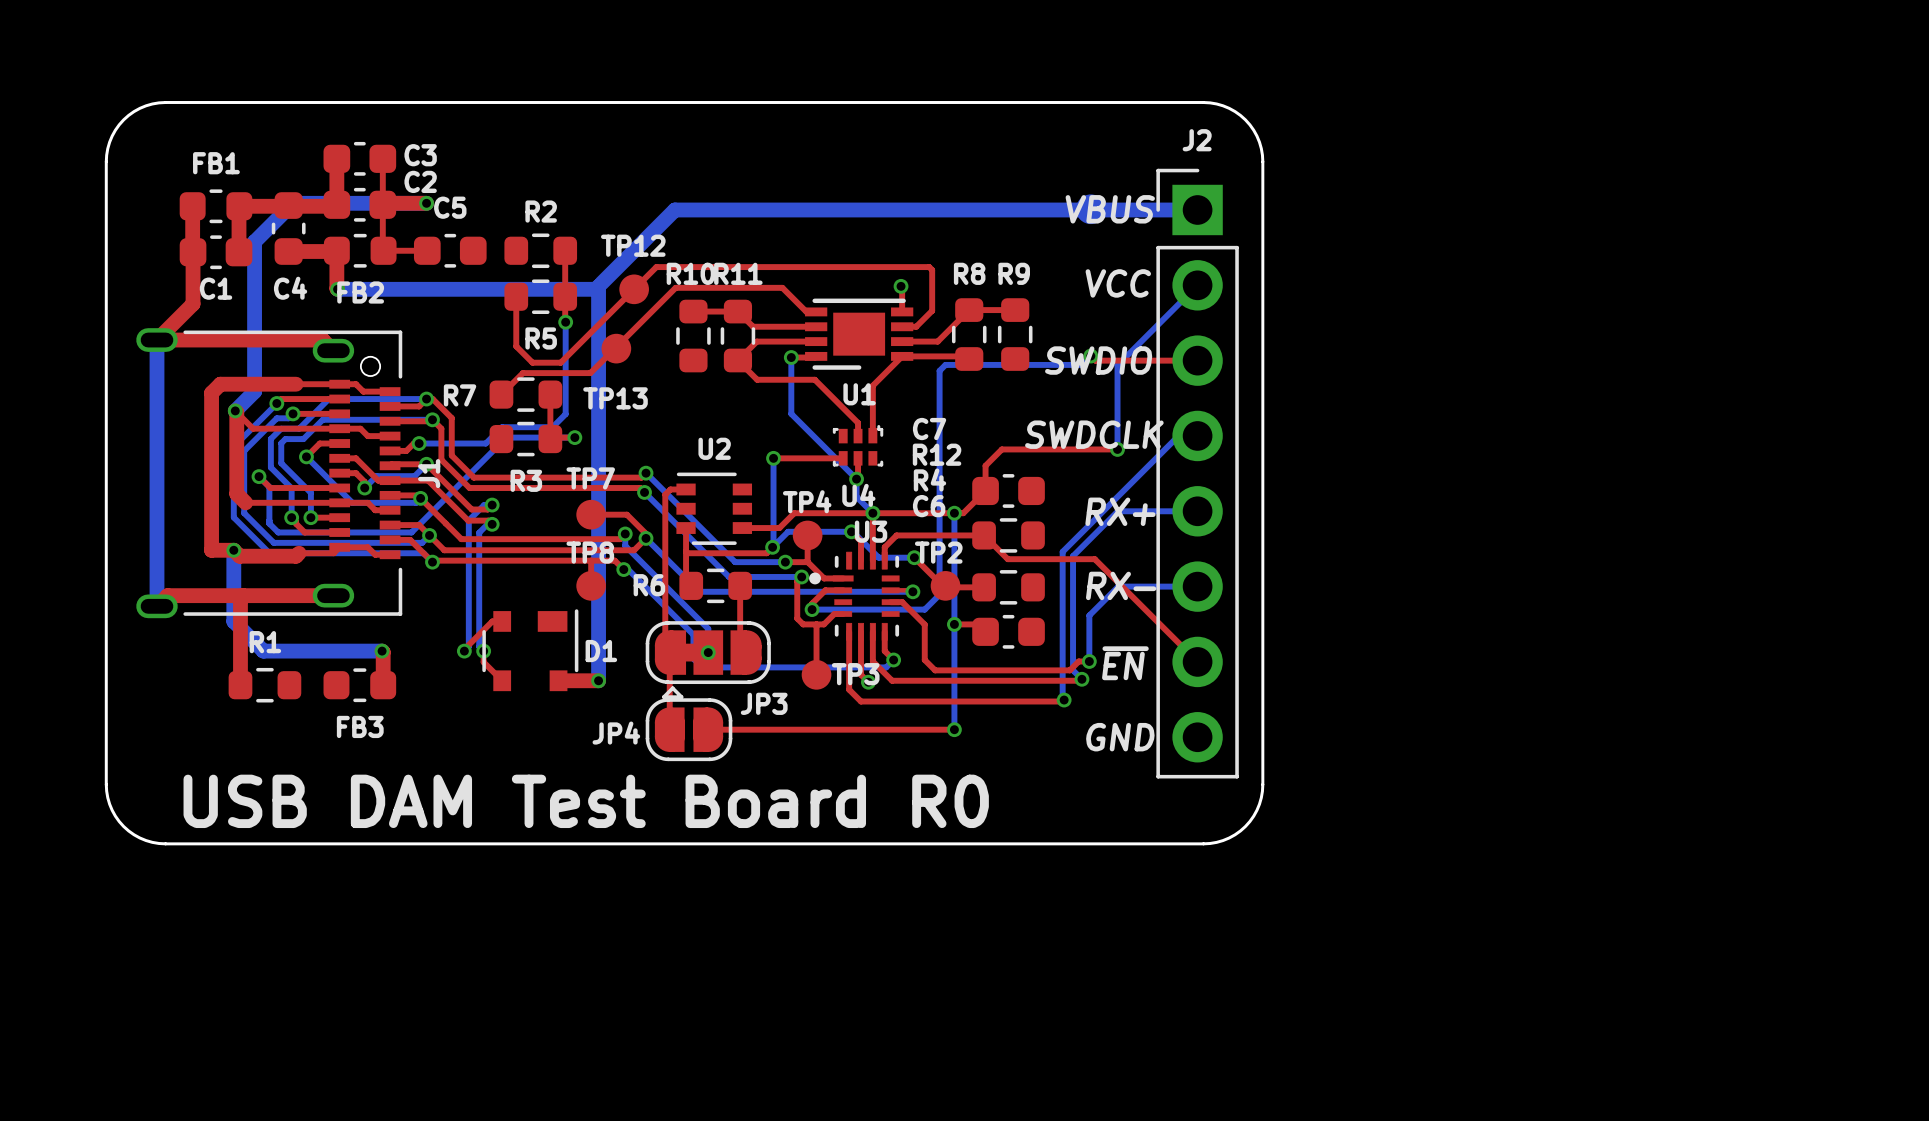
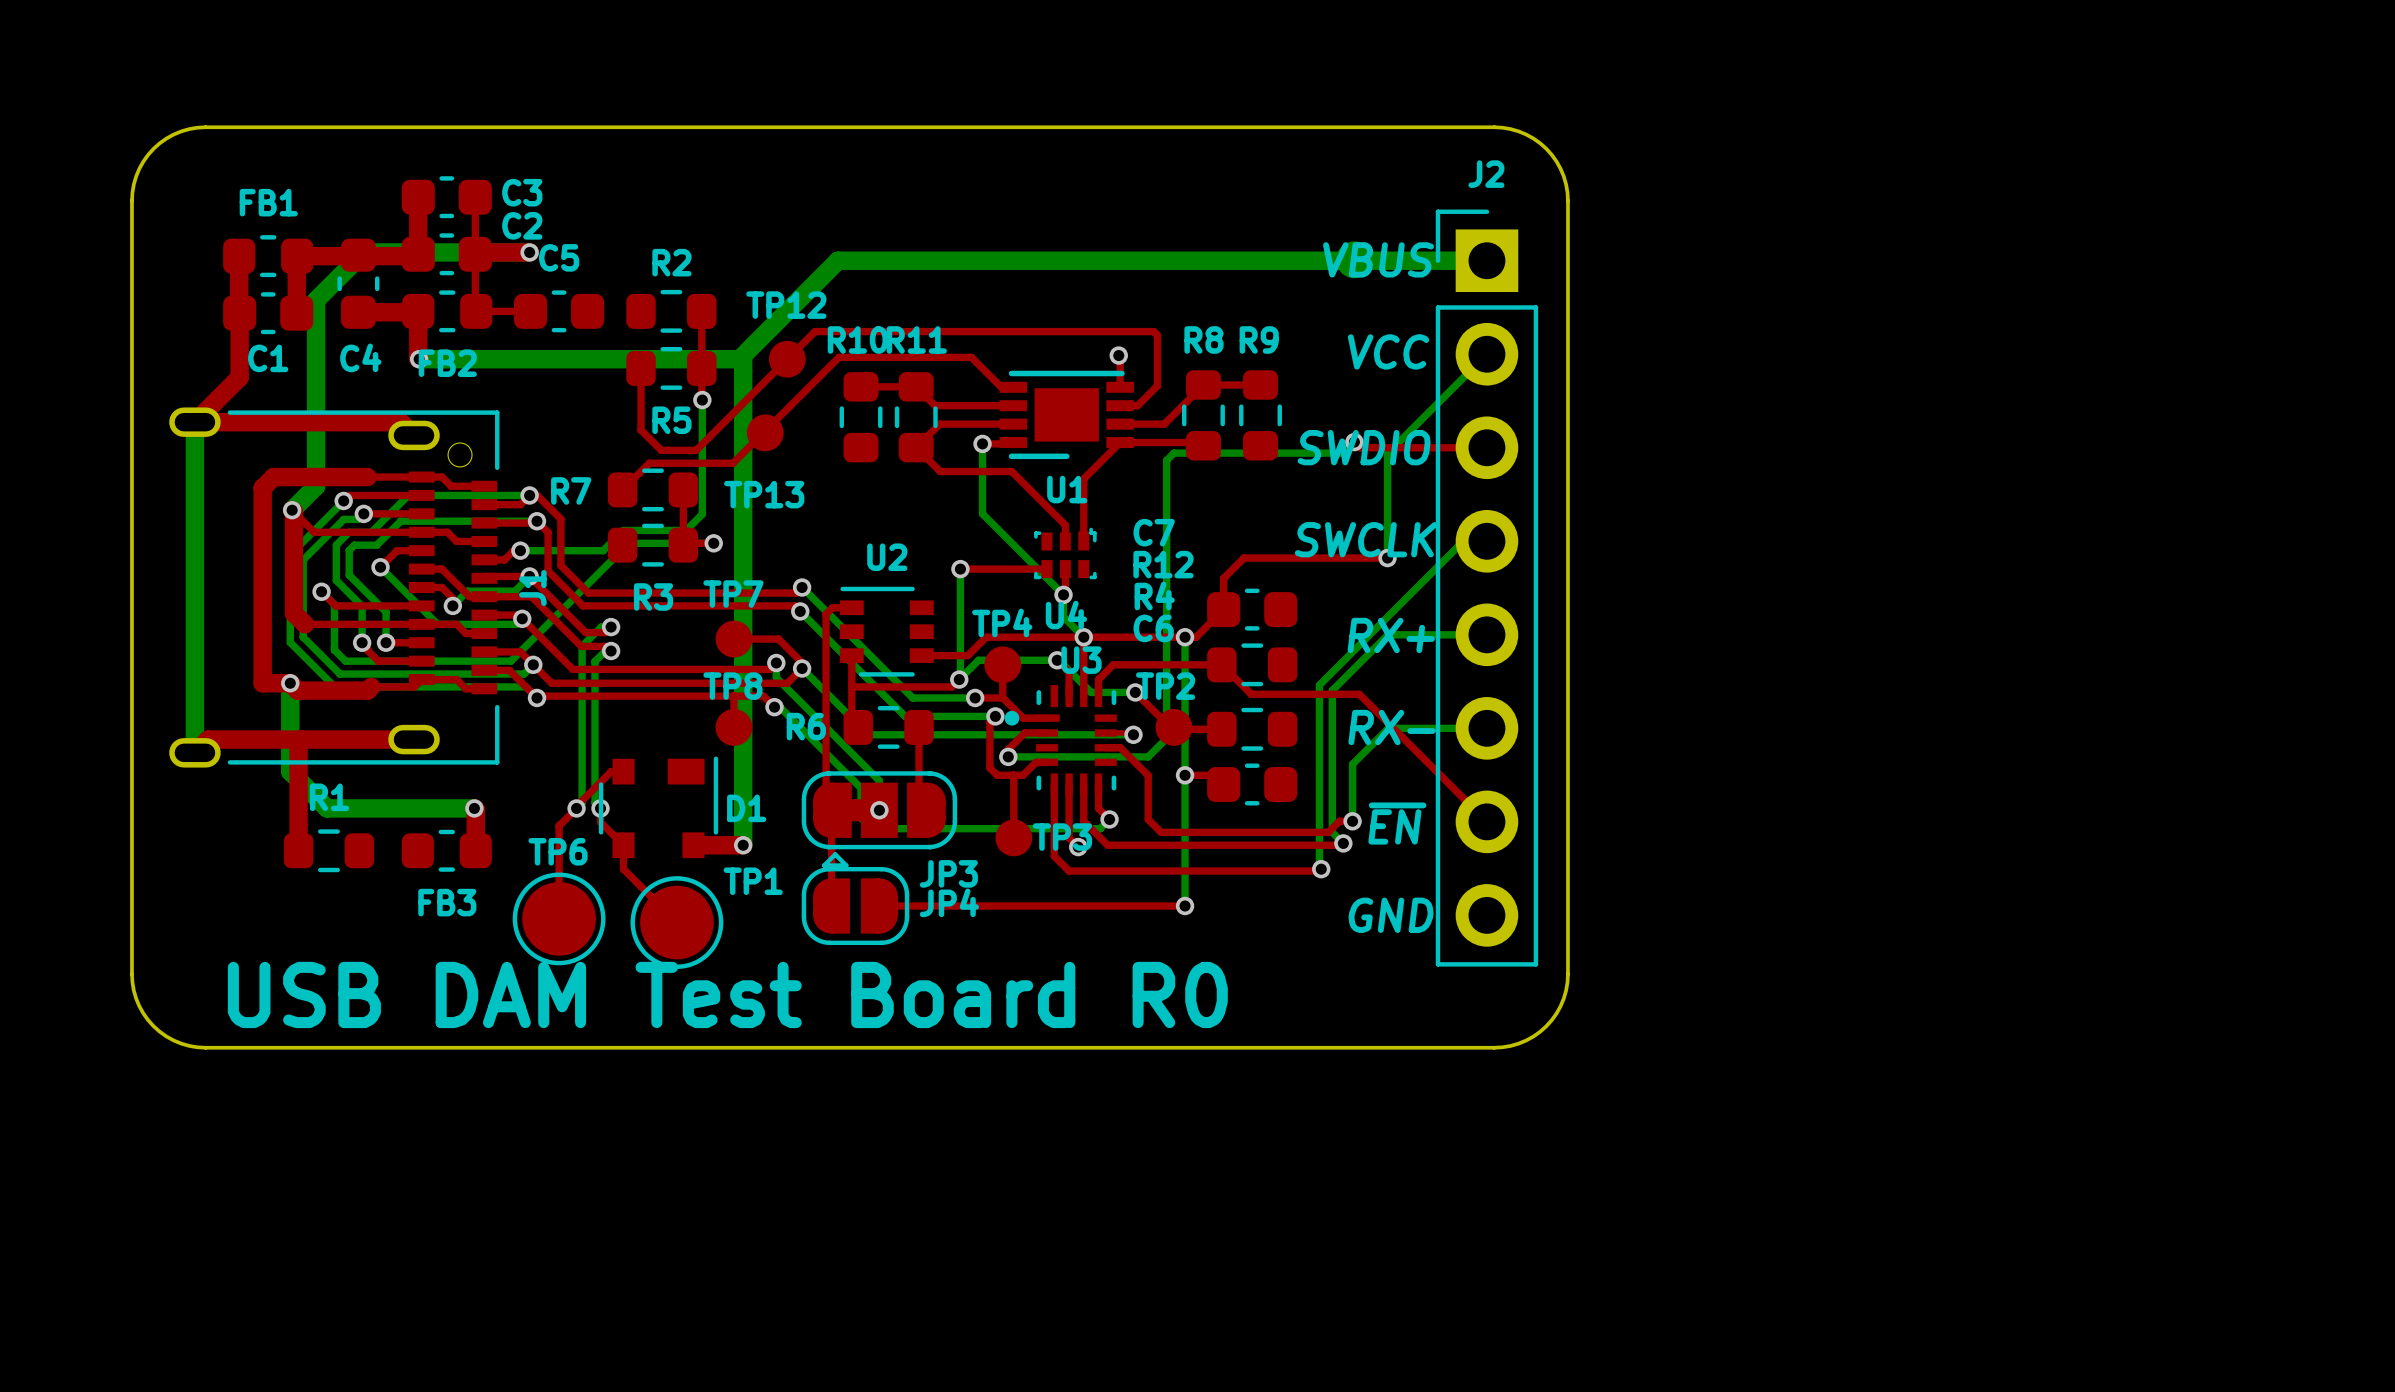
text: SWDCLK (1094, 434) -> SWCLK (1366, 539)
top track: none -> (576, 808) (559, 825) (559, 918)
top track: none -> (623, 845) (623, 869) (676, 922)
JP4 name position: JP4 (616, 733) -> JP4 (949, 902)
TP6: none -> (559, 918)
TP1: none -> (676, 922)

